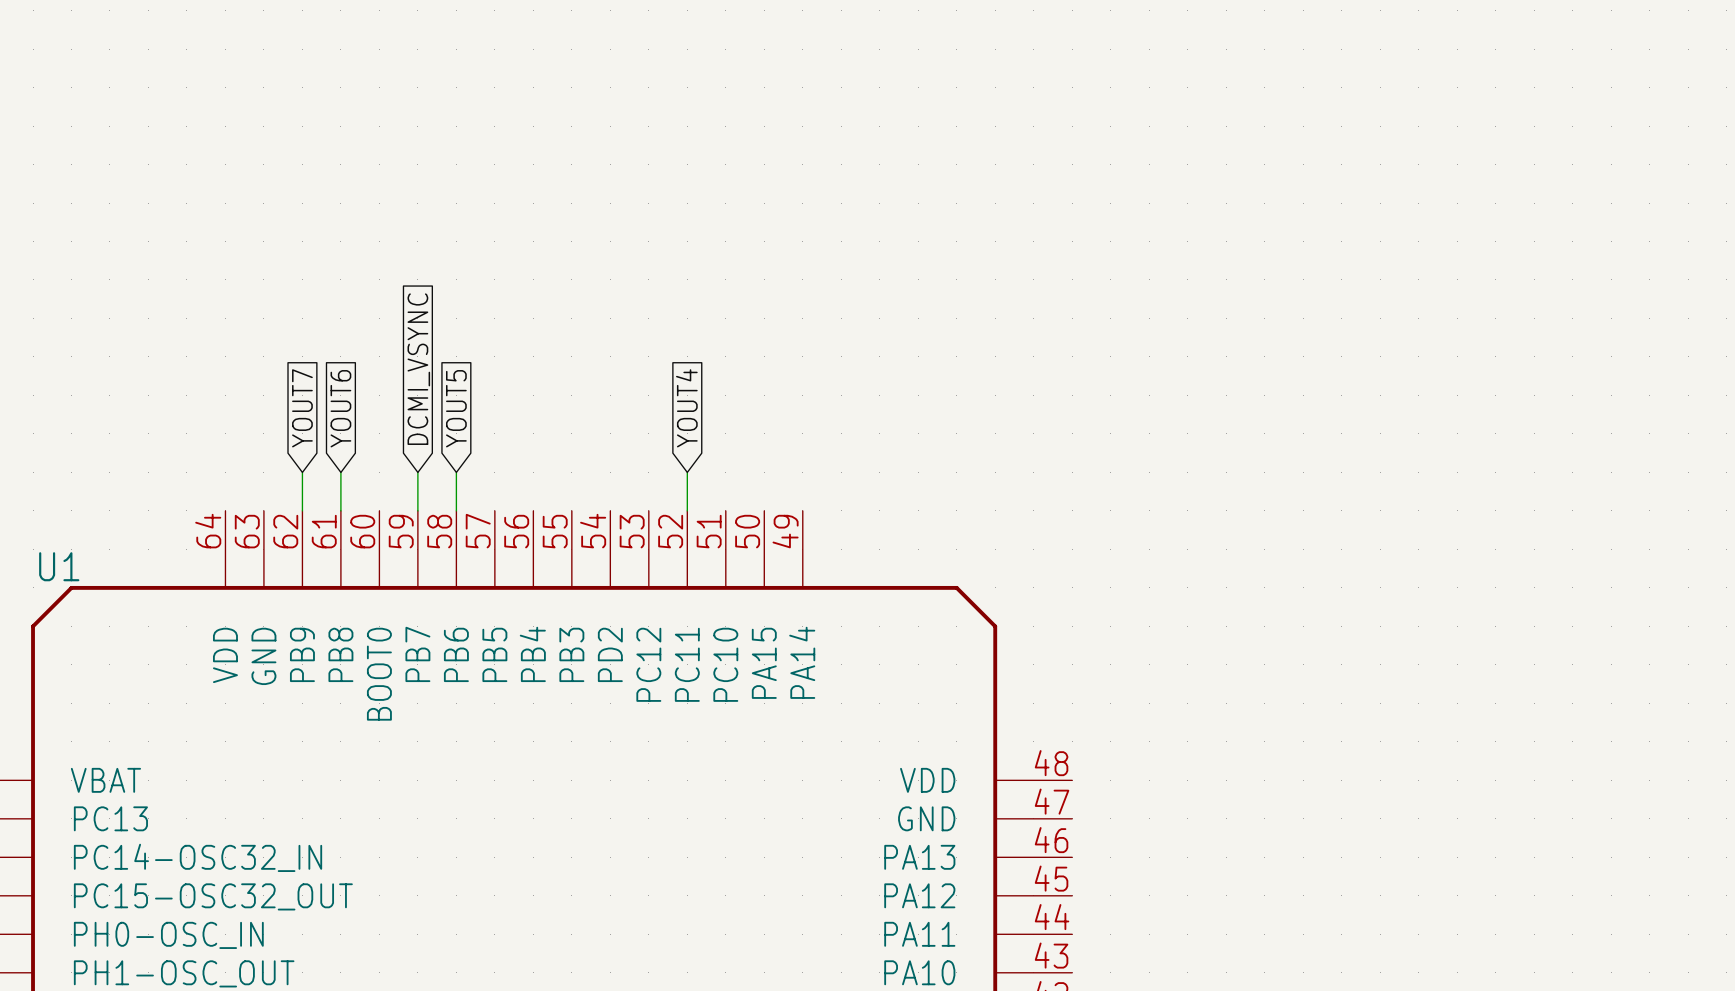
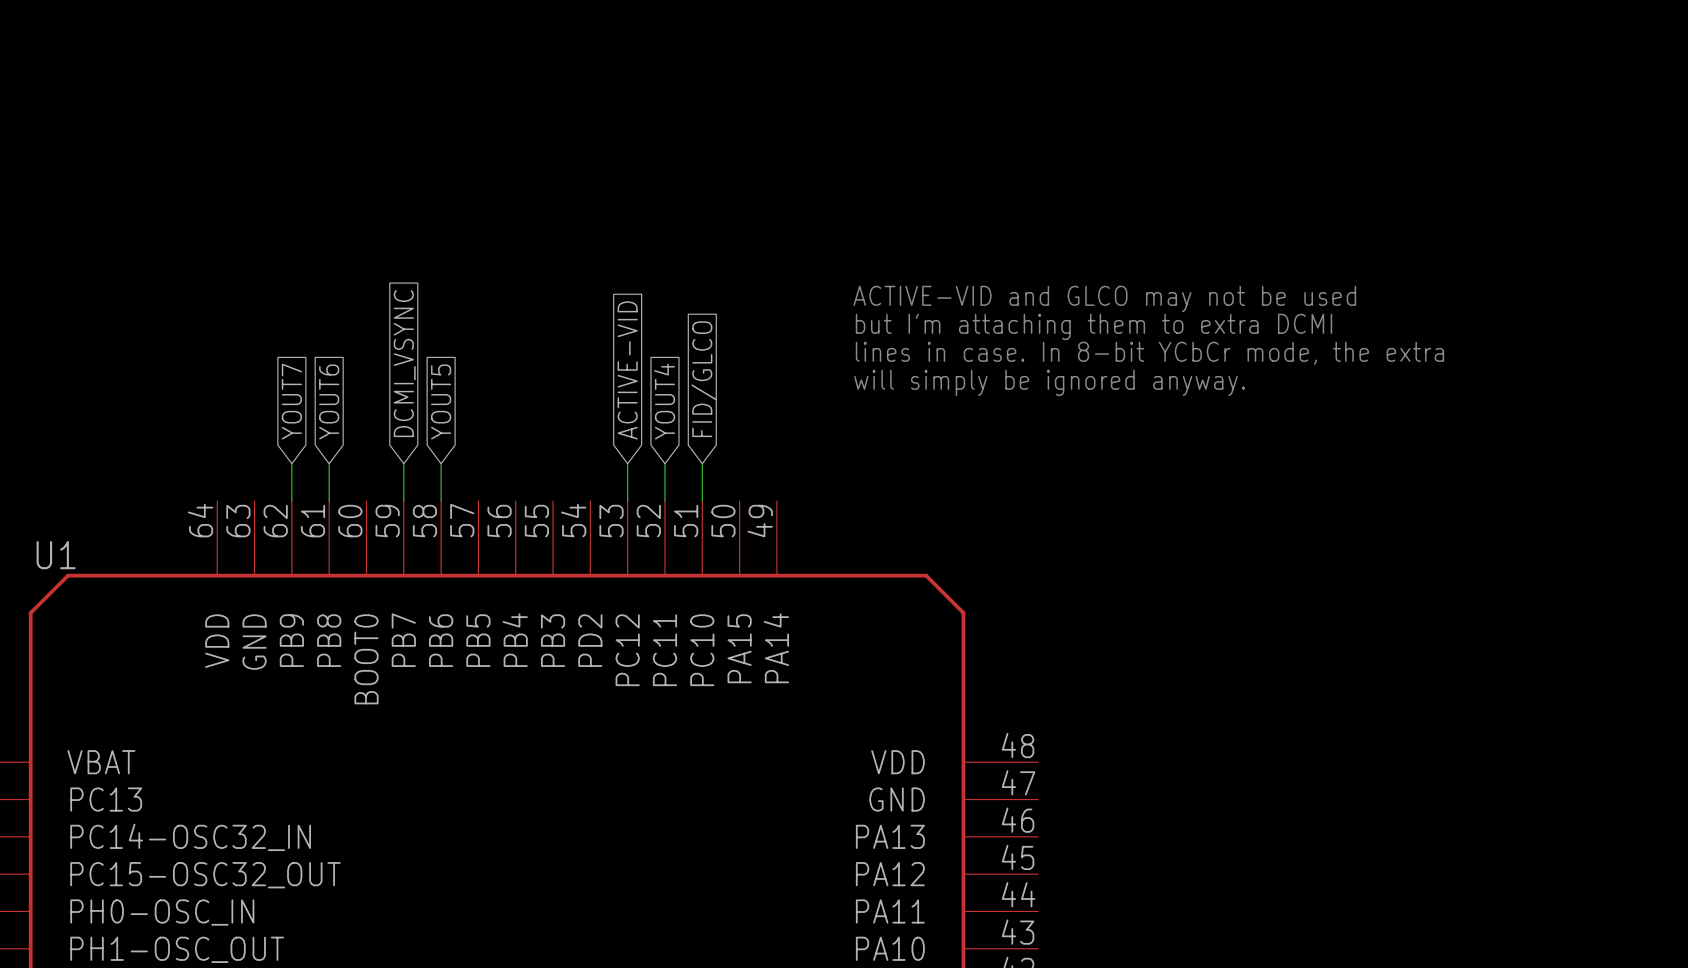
text: none -> ACTIVE-VID and GLCO may not be used (1104, 298)
text: none -> but I'm attaching them to extra DCMI (1093, 326)
text: none -> lines in case. In 8-bit YCbCr mode, the extra (1149, 353)
global label: none -> ACTIVE-VID (627, 370)
global label: none -> FID/GLCO (704, 379)
text: none -> will simply be ignored anyway. (1049, 382)
wire: none -> (627, 463) (627, 501)
wire: none -> (702, 463) (702, 501)

